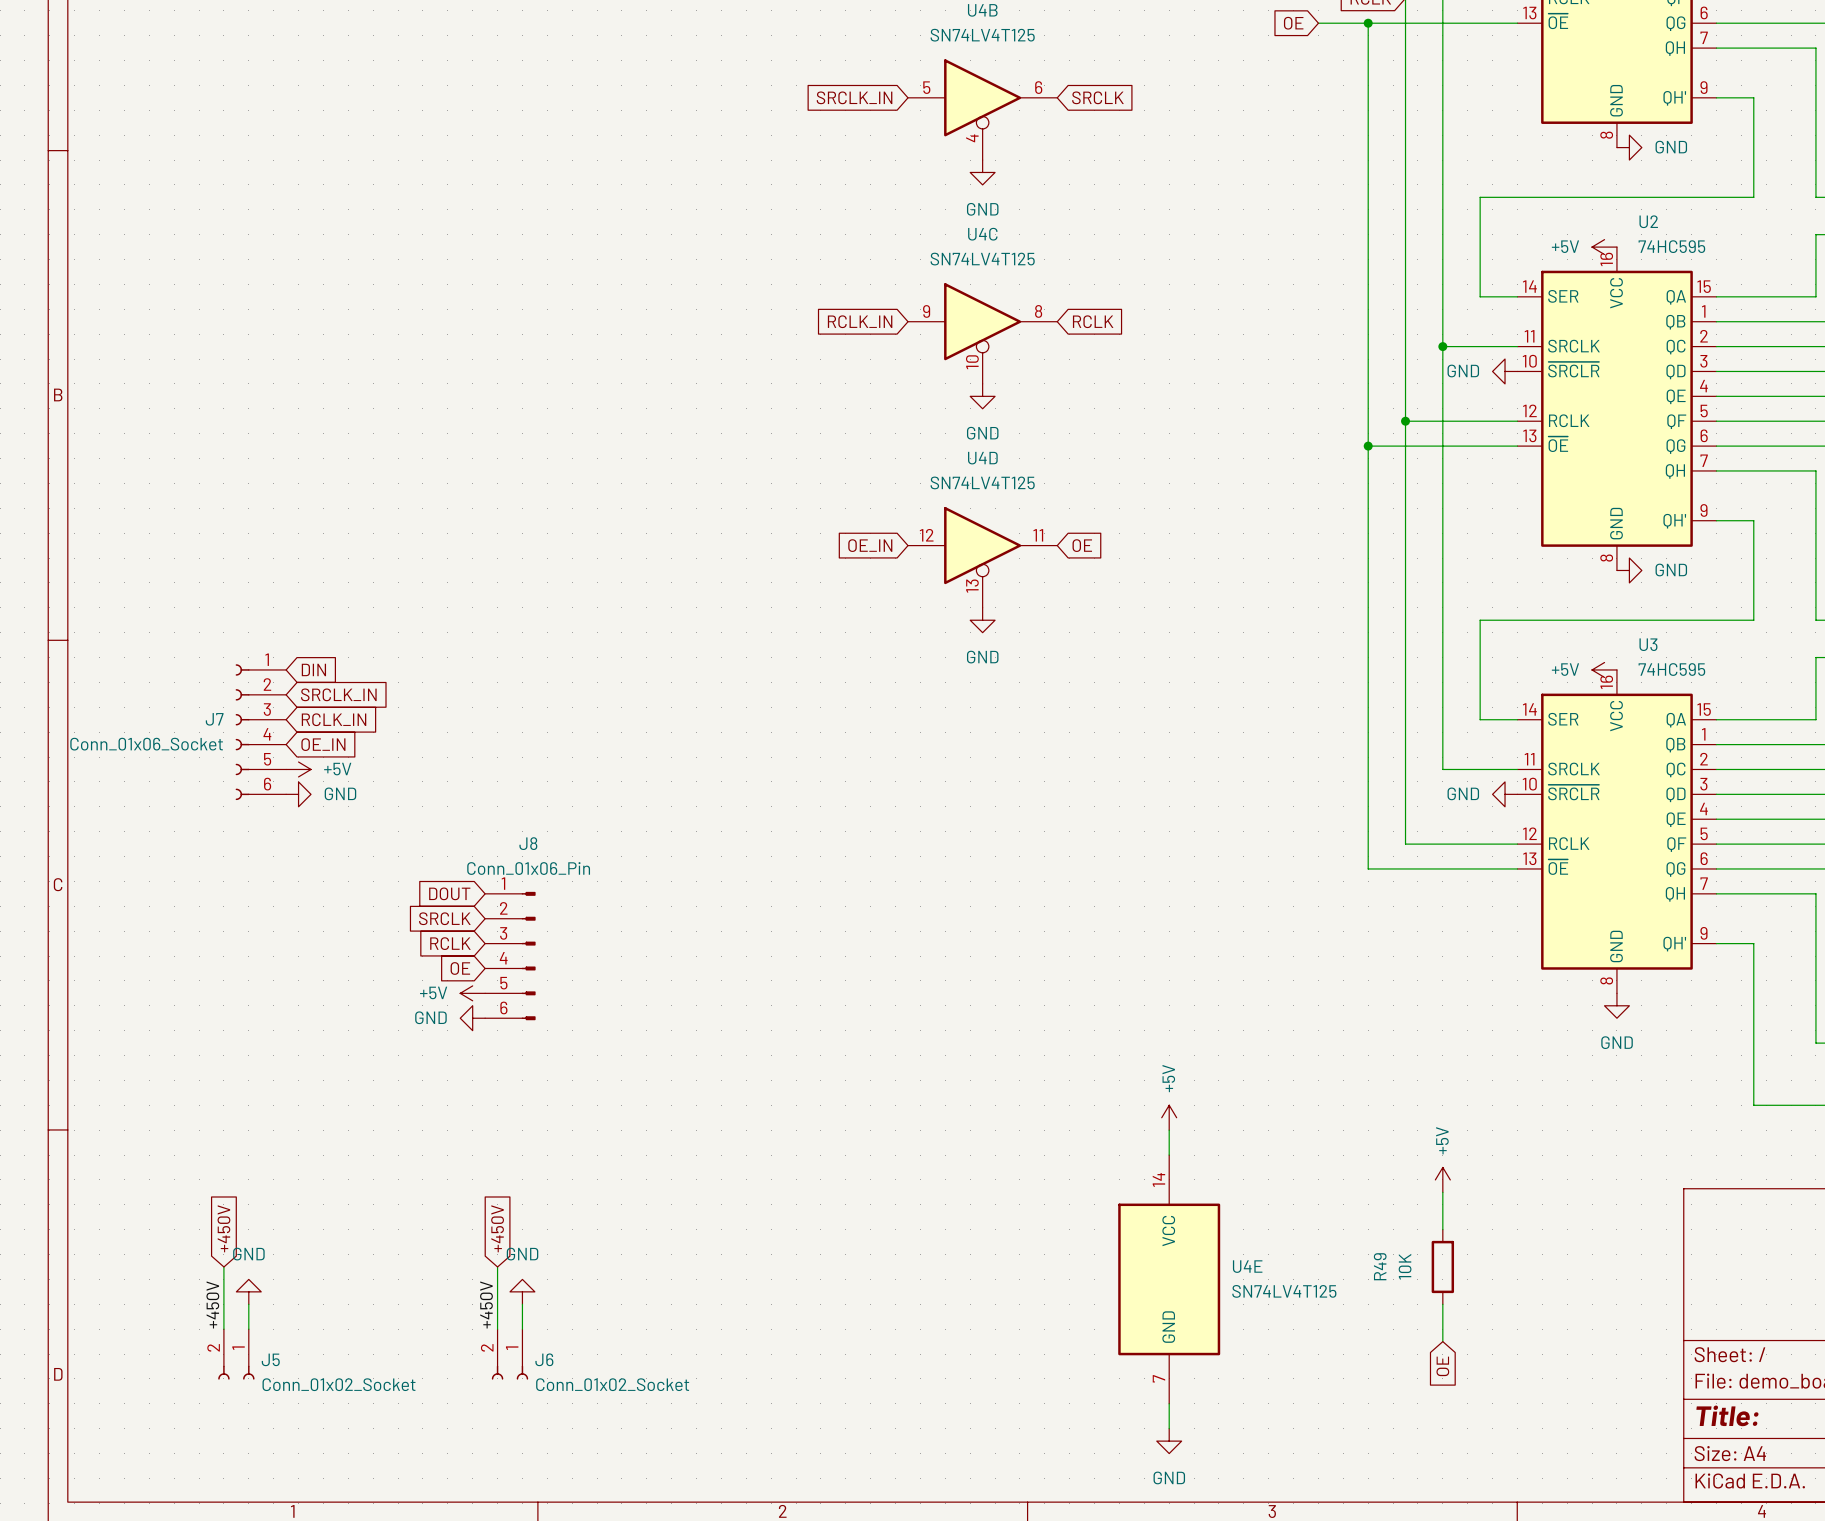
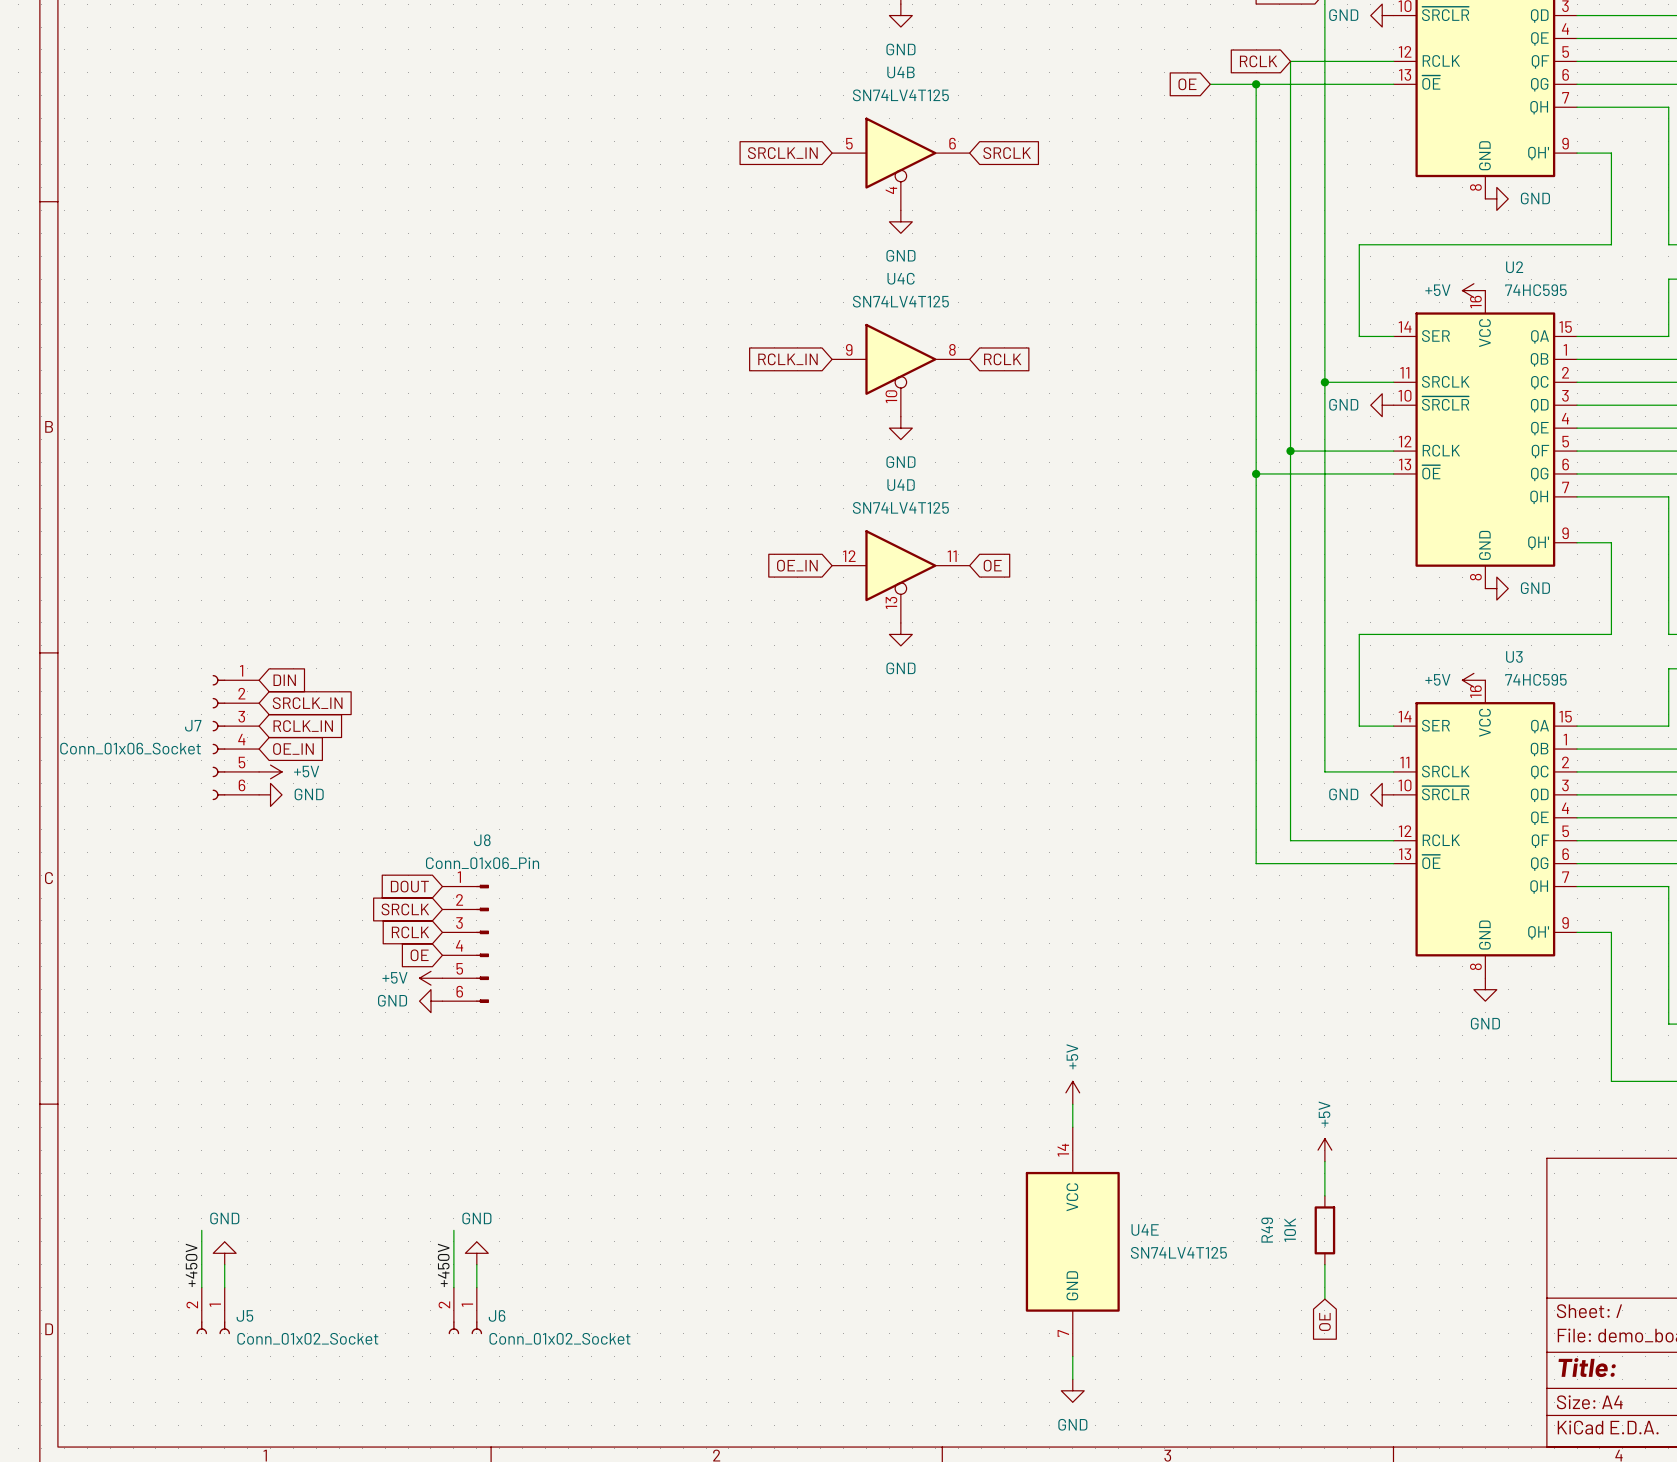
global label: +450V (223, 1228) -> none
global label: +450V (497, 1228) -> none

